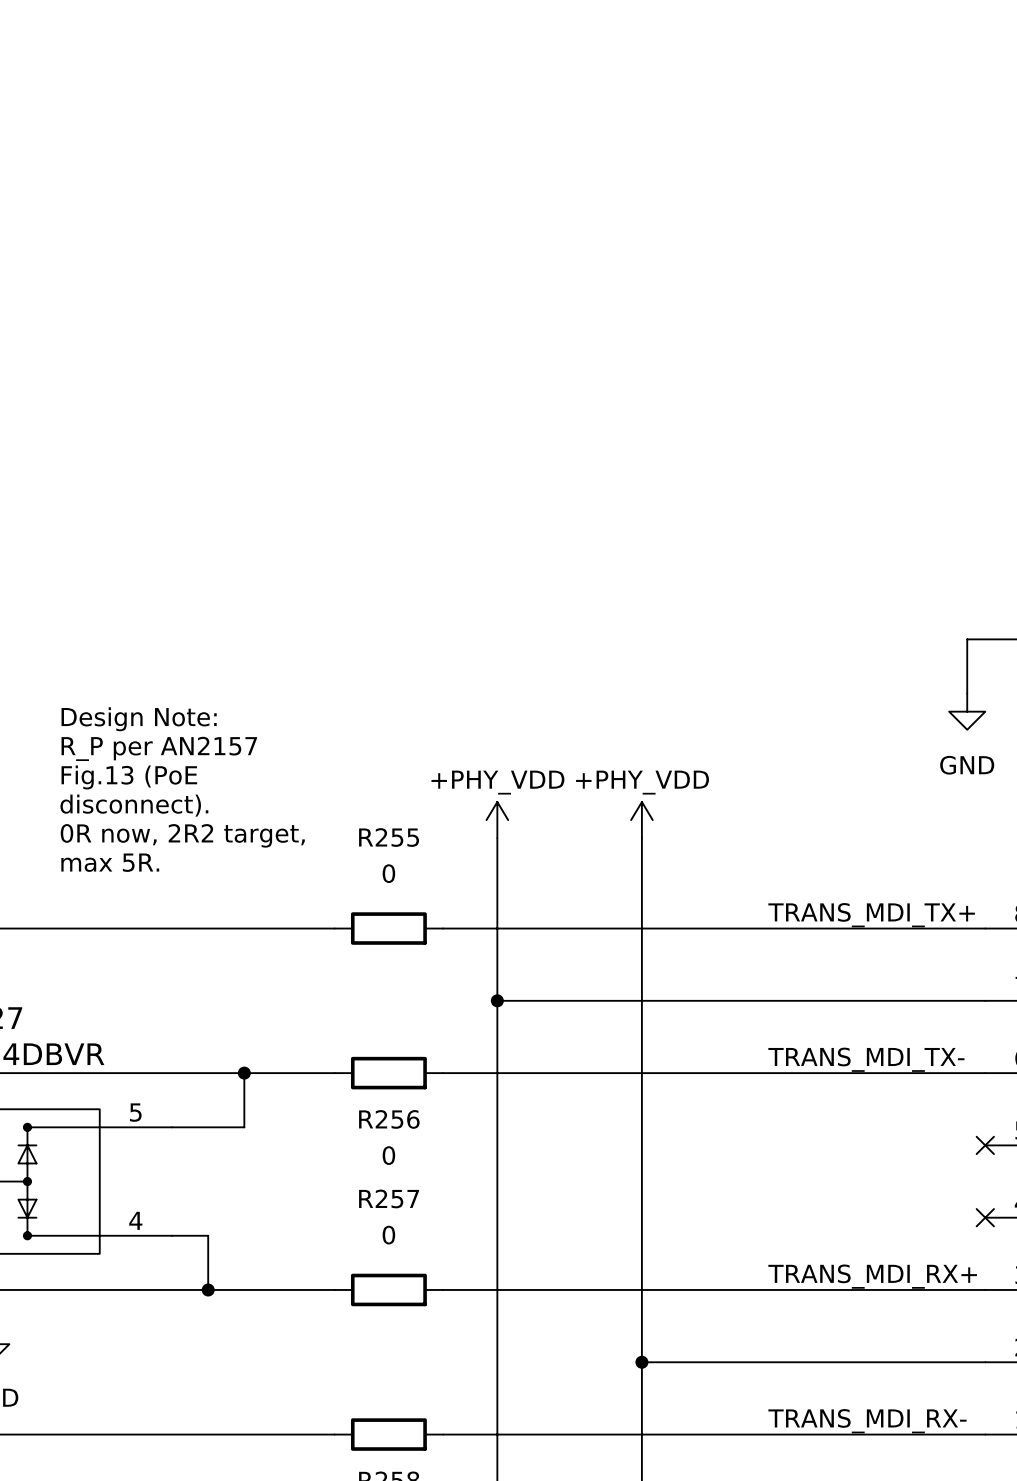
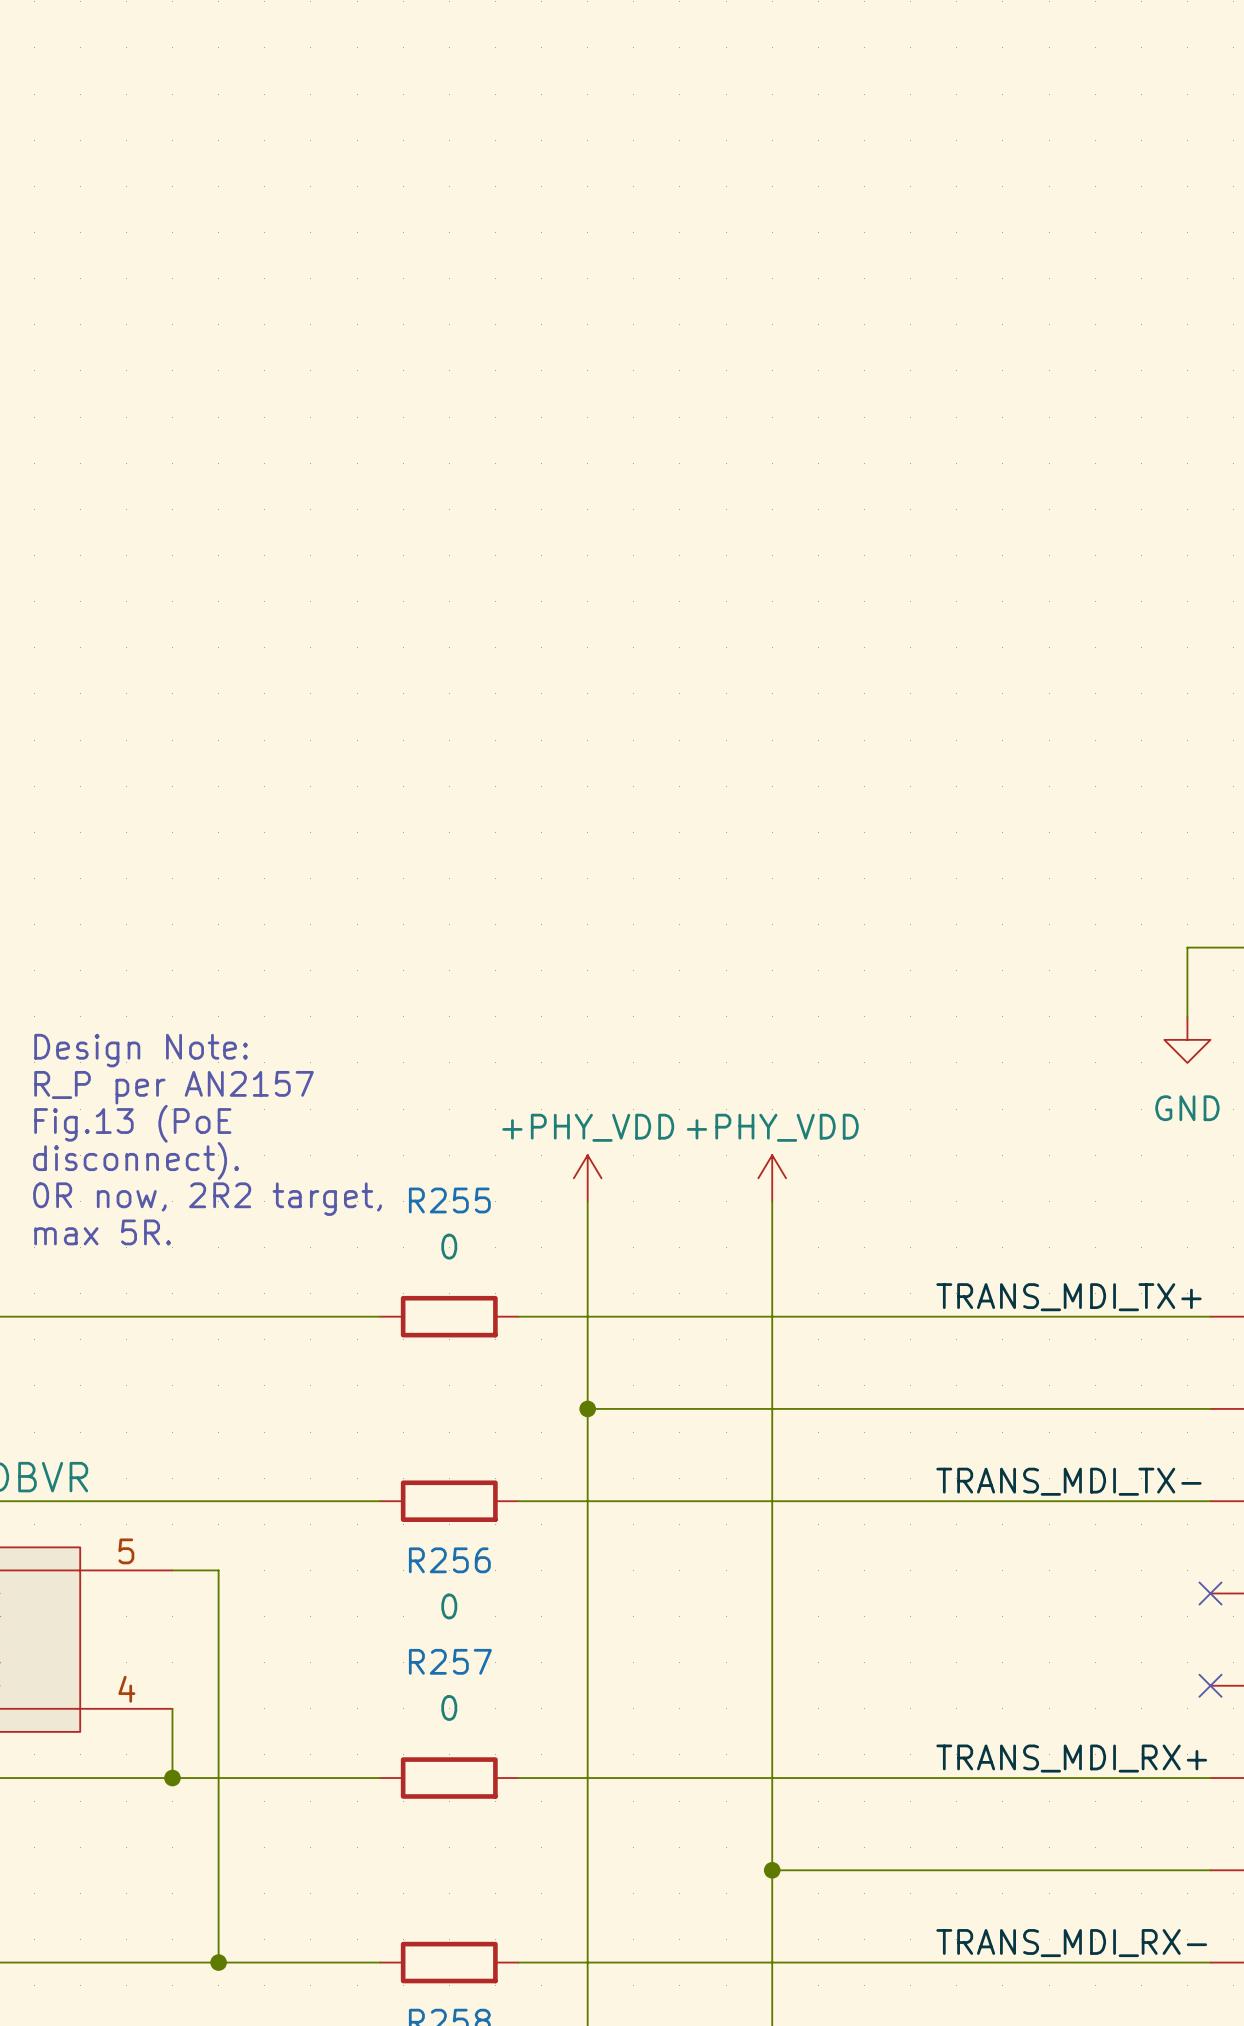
wire: (244, 1073) (244, 1127) (208, 1127) -> (218, 1708) (218, 1570)
junction: (244, 1073) -> none
wire: (172, 1235) (208, 1235) -> (172, 1708) (172, 1778)
wire: none -> (218, 1778) (218, 1962)
junction position: (208, 1289) -> (172, 1778)
junction: none -> (218, 1962)

